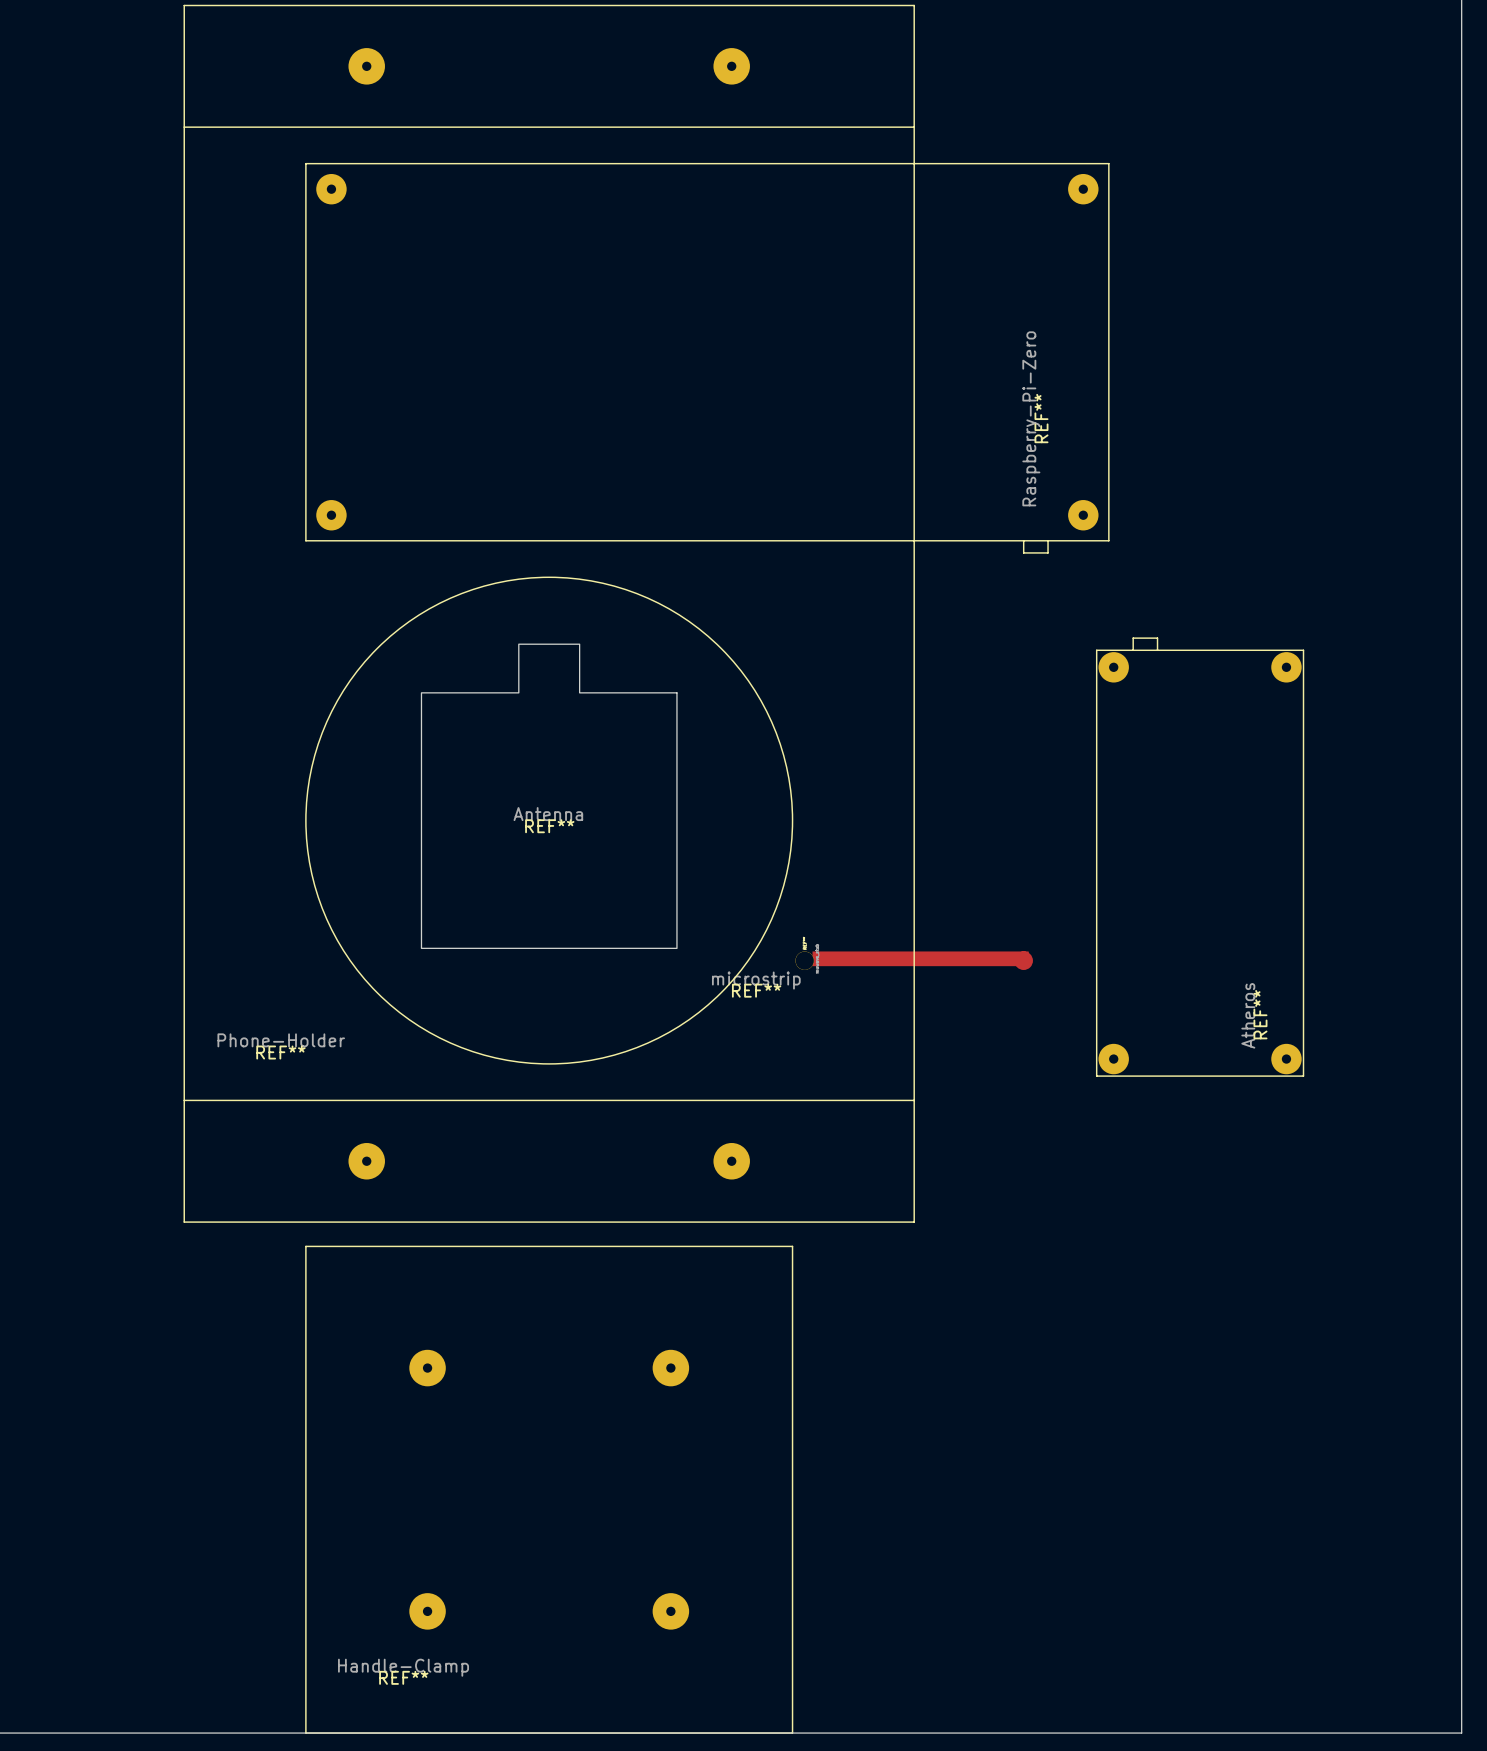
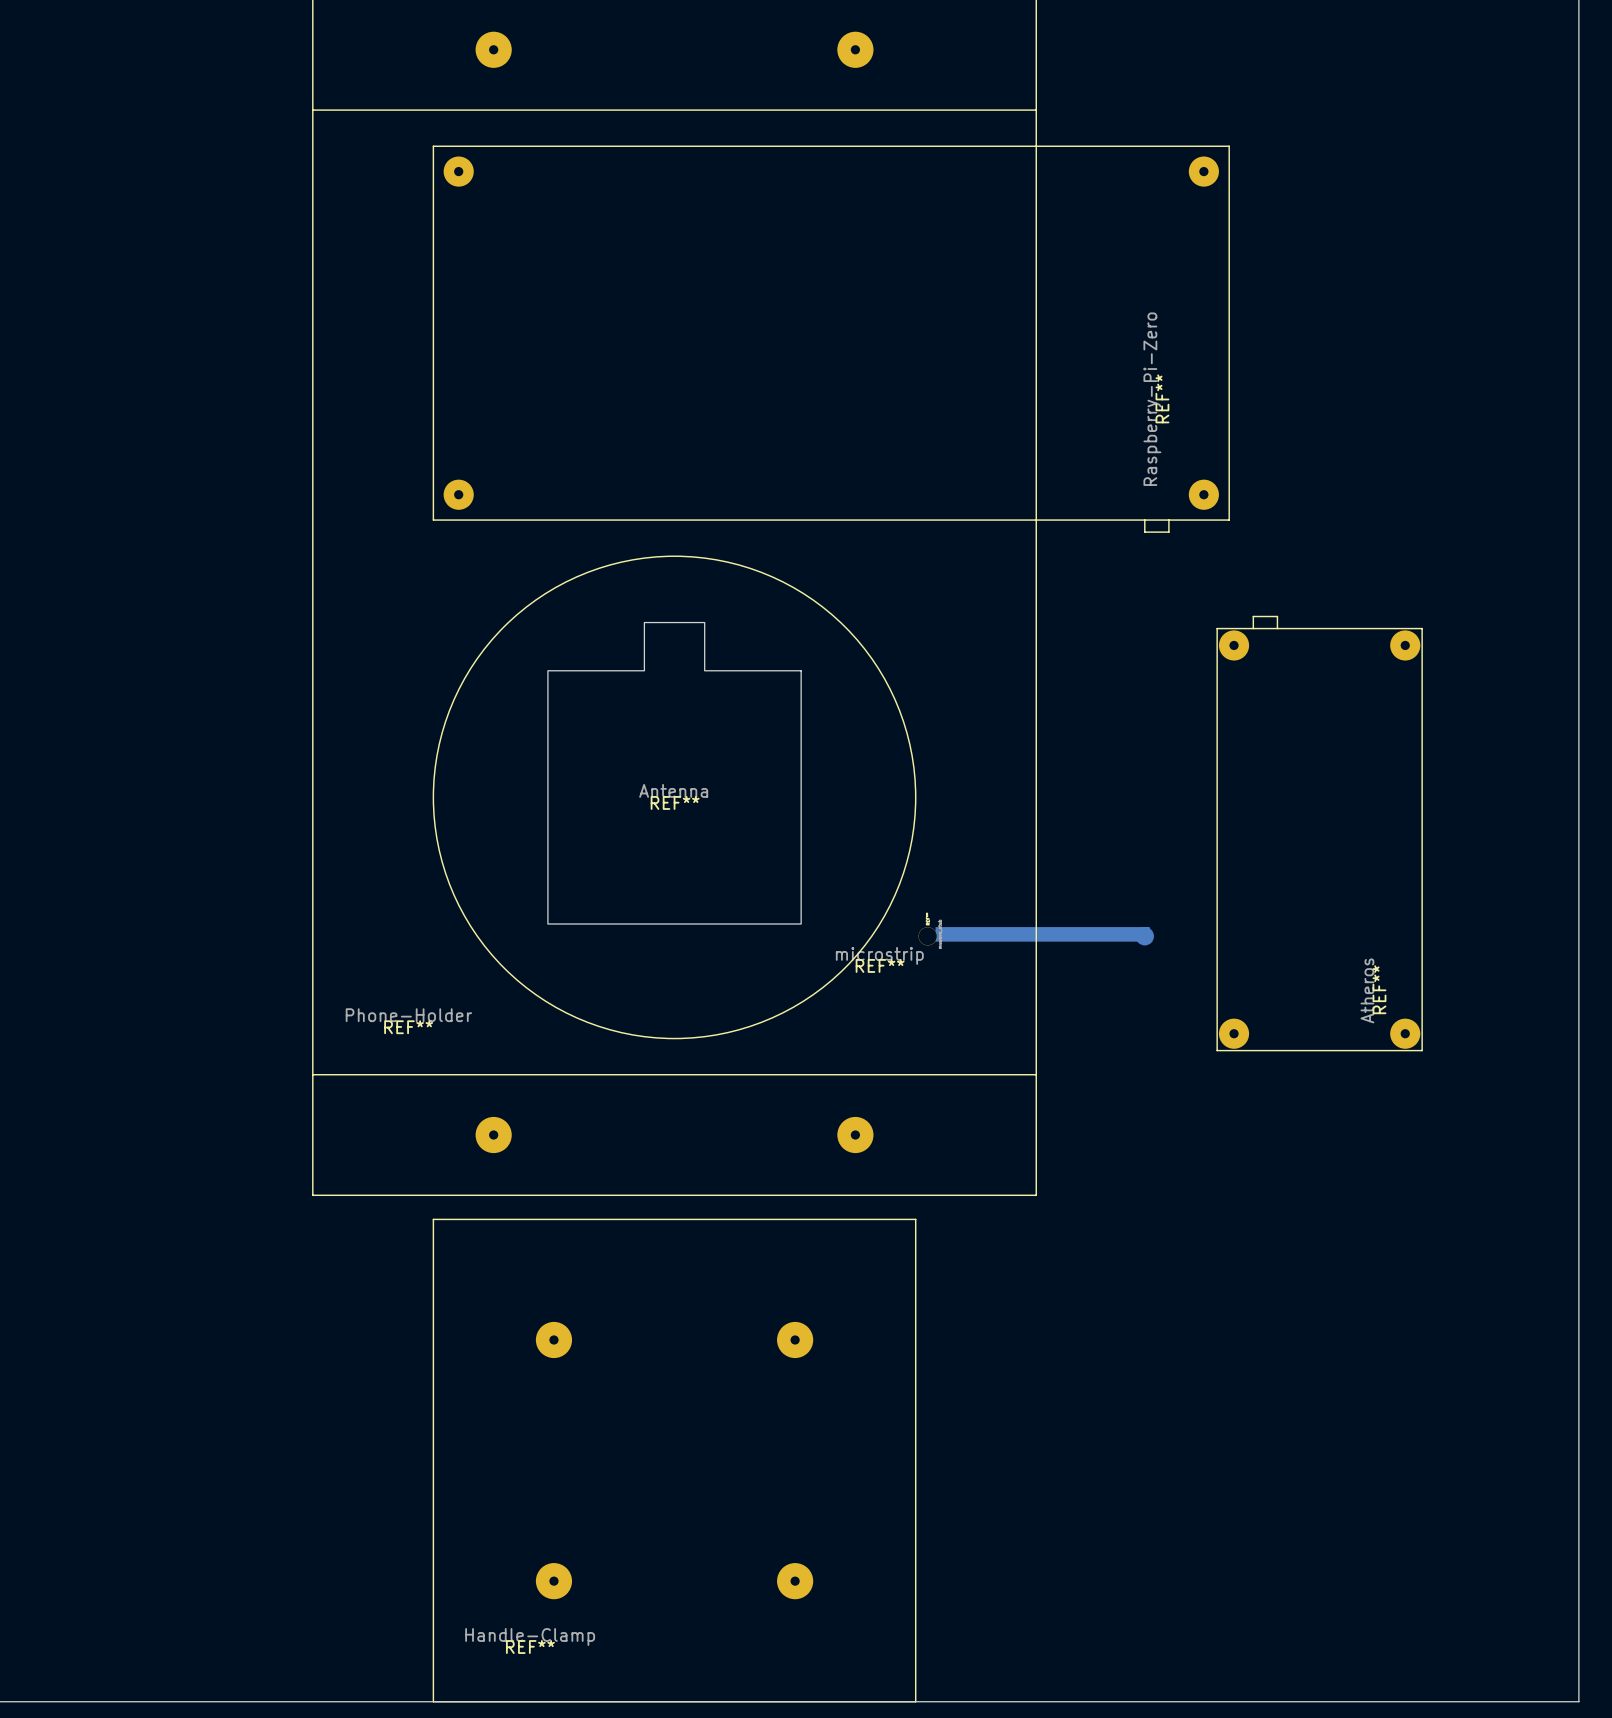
REF** footprint: [795, 951, 1033, 970] -> [918, 927, 1154, 946]
part footprint: [809, 951, 1029, 967] -> [932, 927, 1150, 942]

